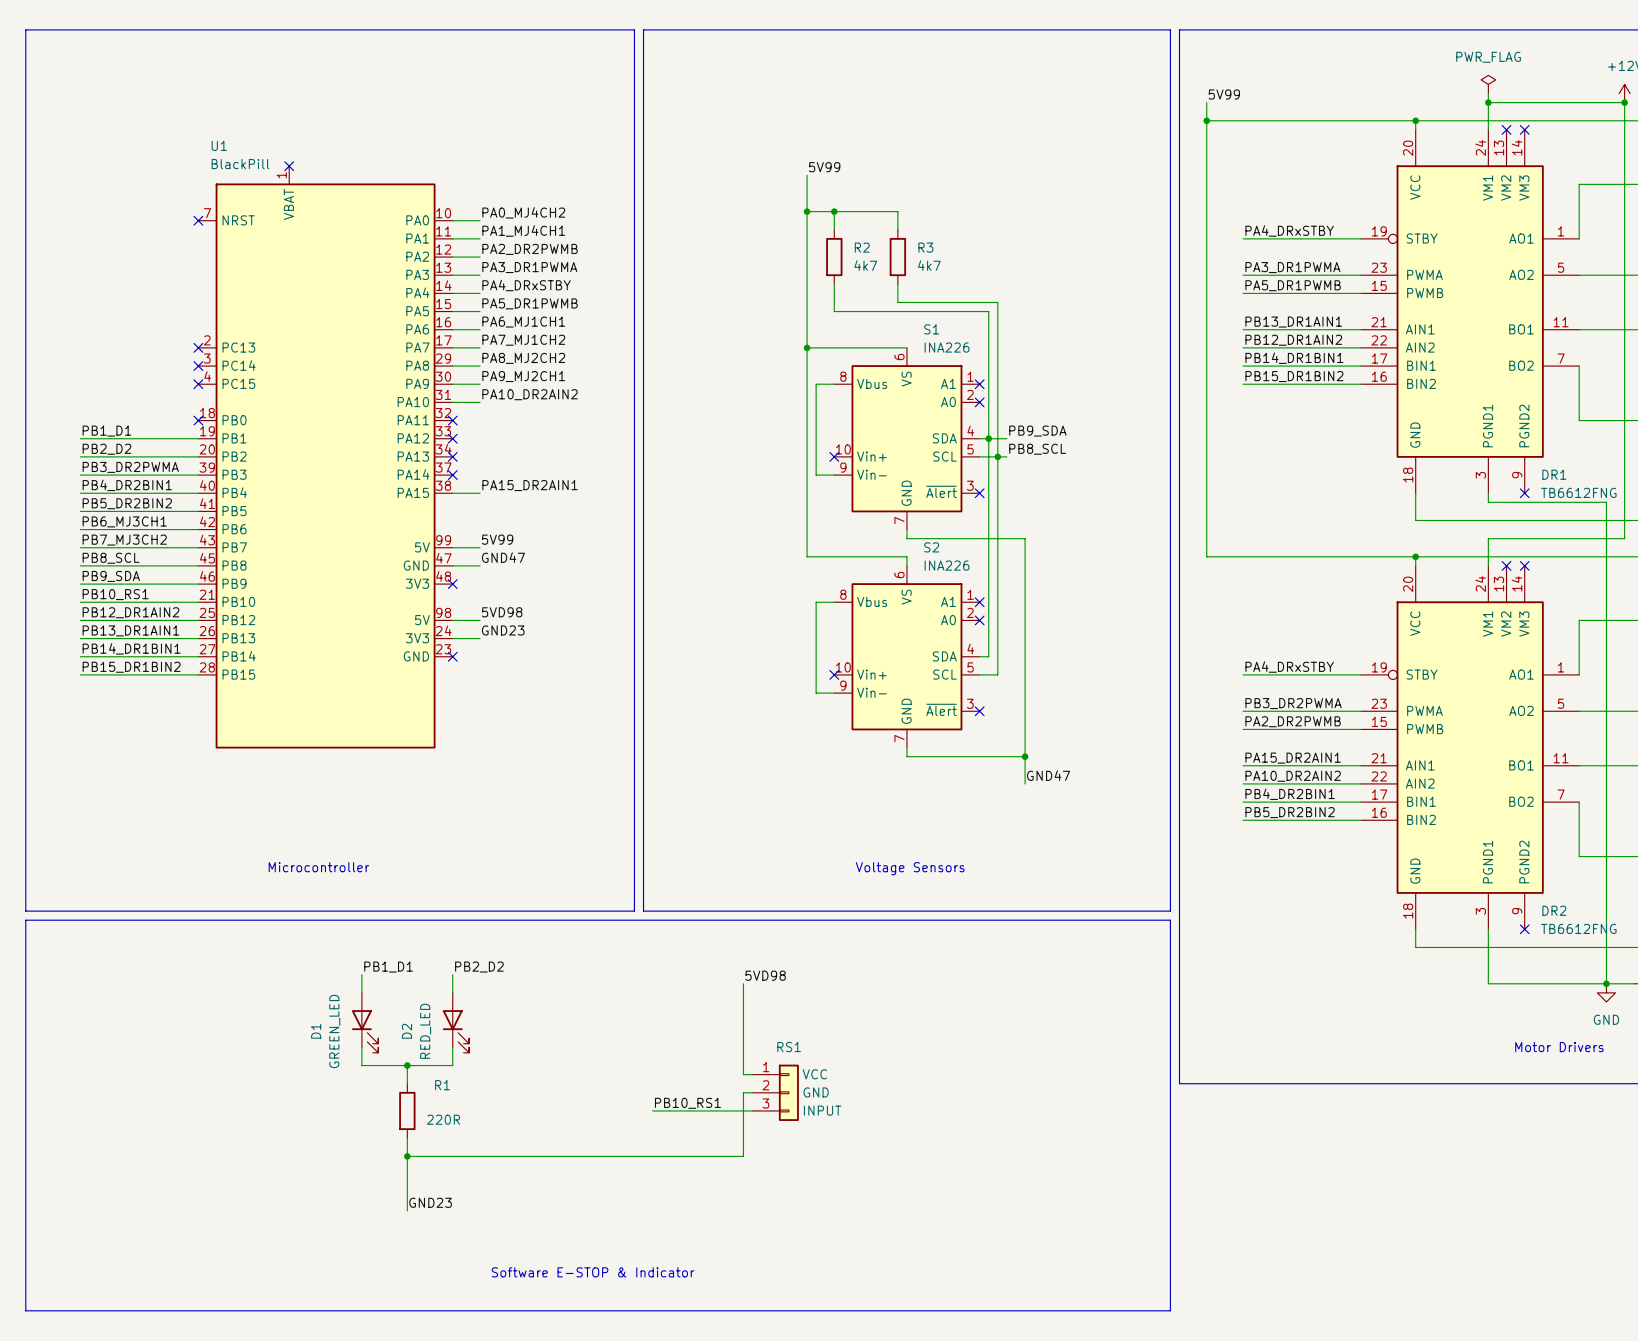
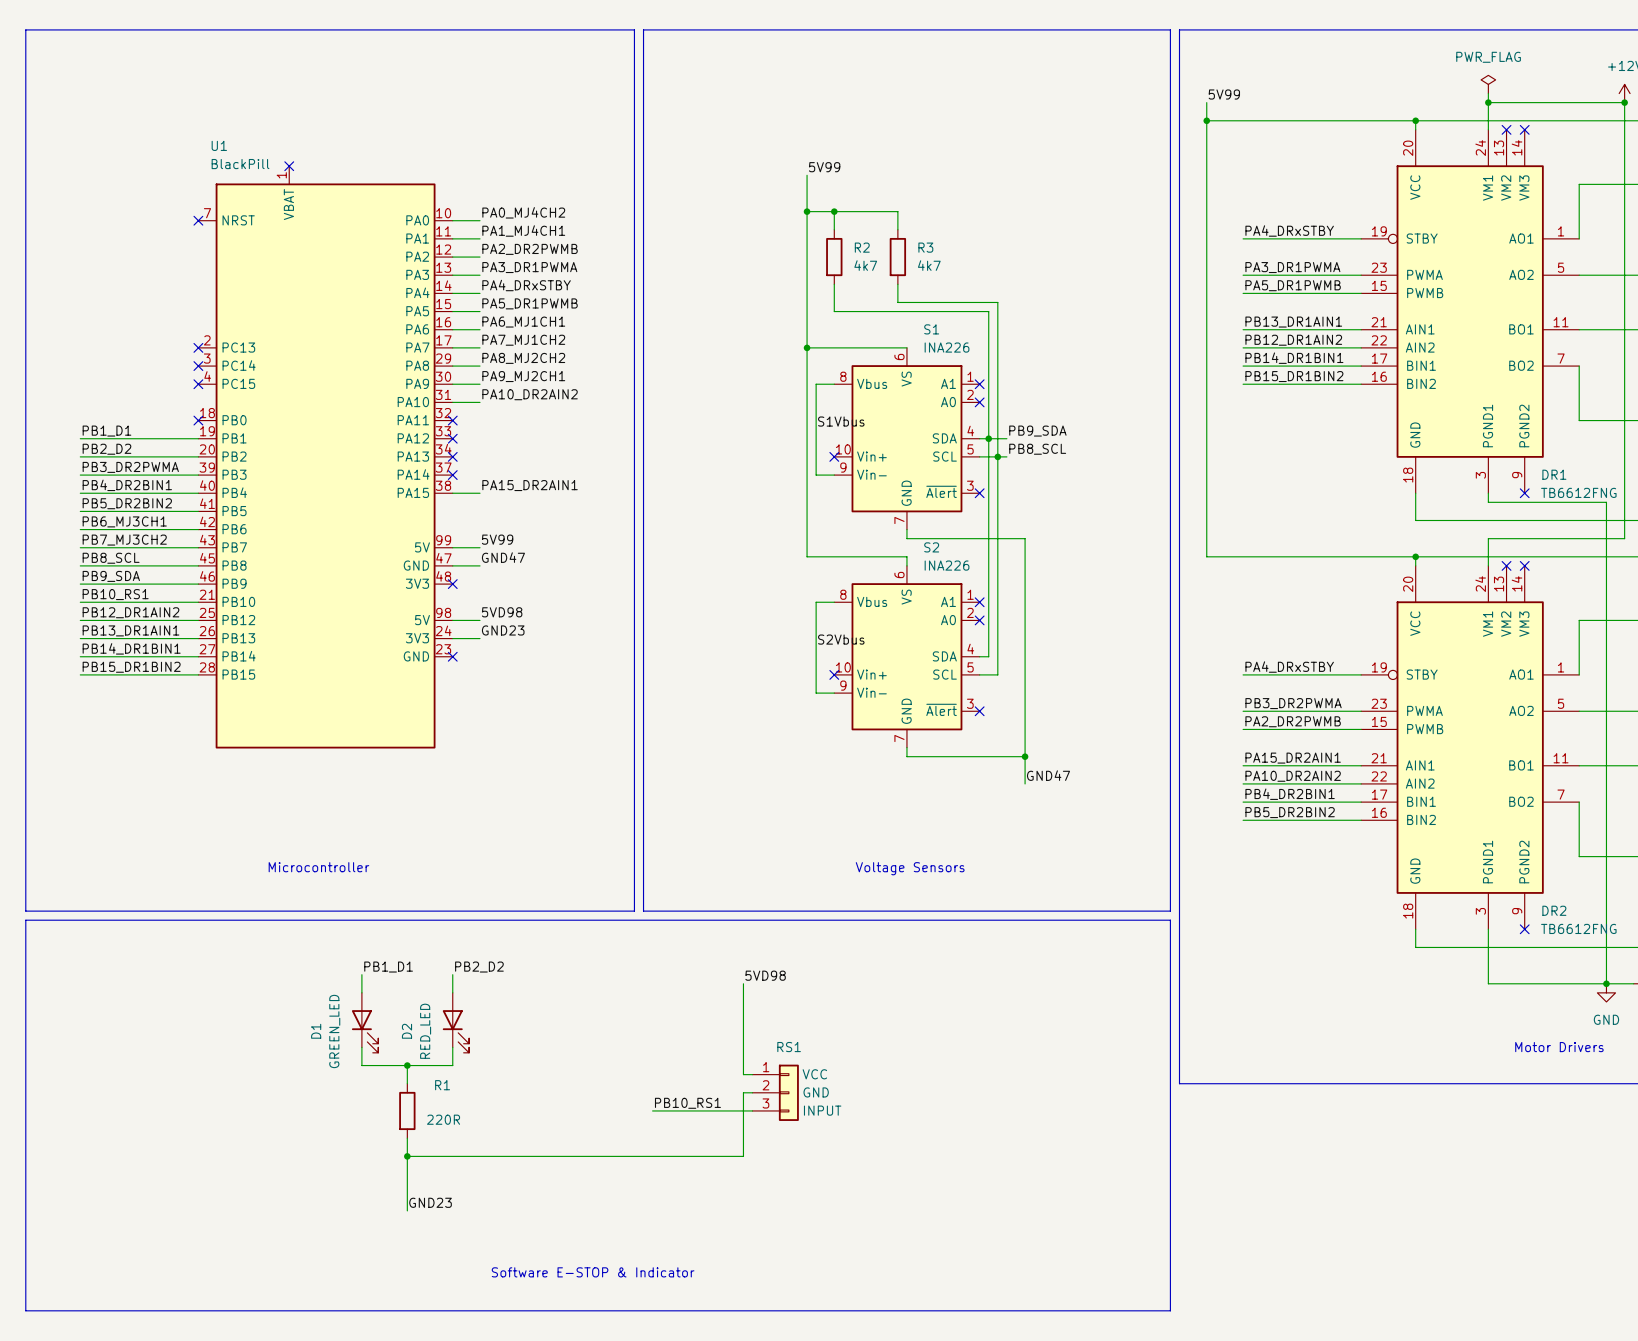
label: none -> S1Vbus (841, 421)
label: none -> S2Vbus (841, 639)

